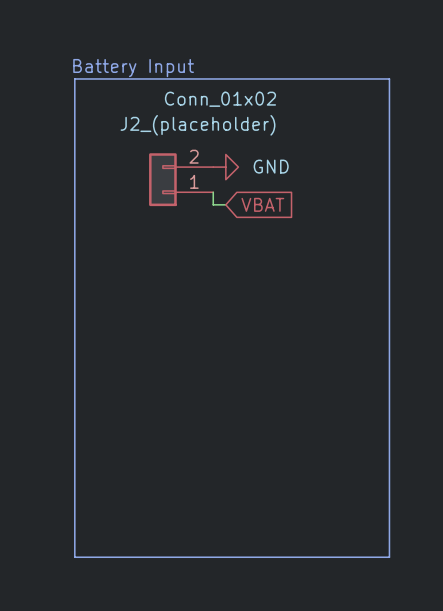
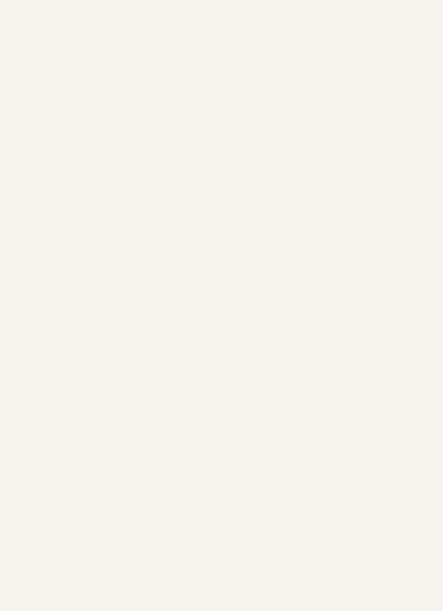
text: Battery Input (133, 68) -> none
line: (74, 78) (389, 78) (389, 557) (74, 557) (74, 78) -> none
power symbol: GND (225, 167) -> none
J2_(placeholder): Conn_01x02 (181, 179) -> none
wire: (213, 192) (213, 204) (225, 204) -> none
global label: VBAT (262, 204) -> none

